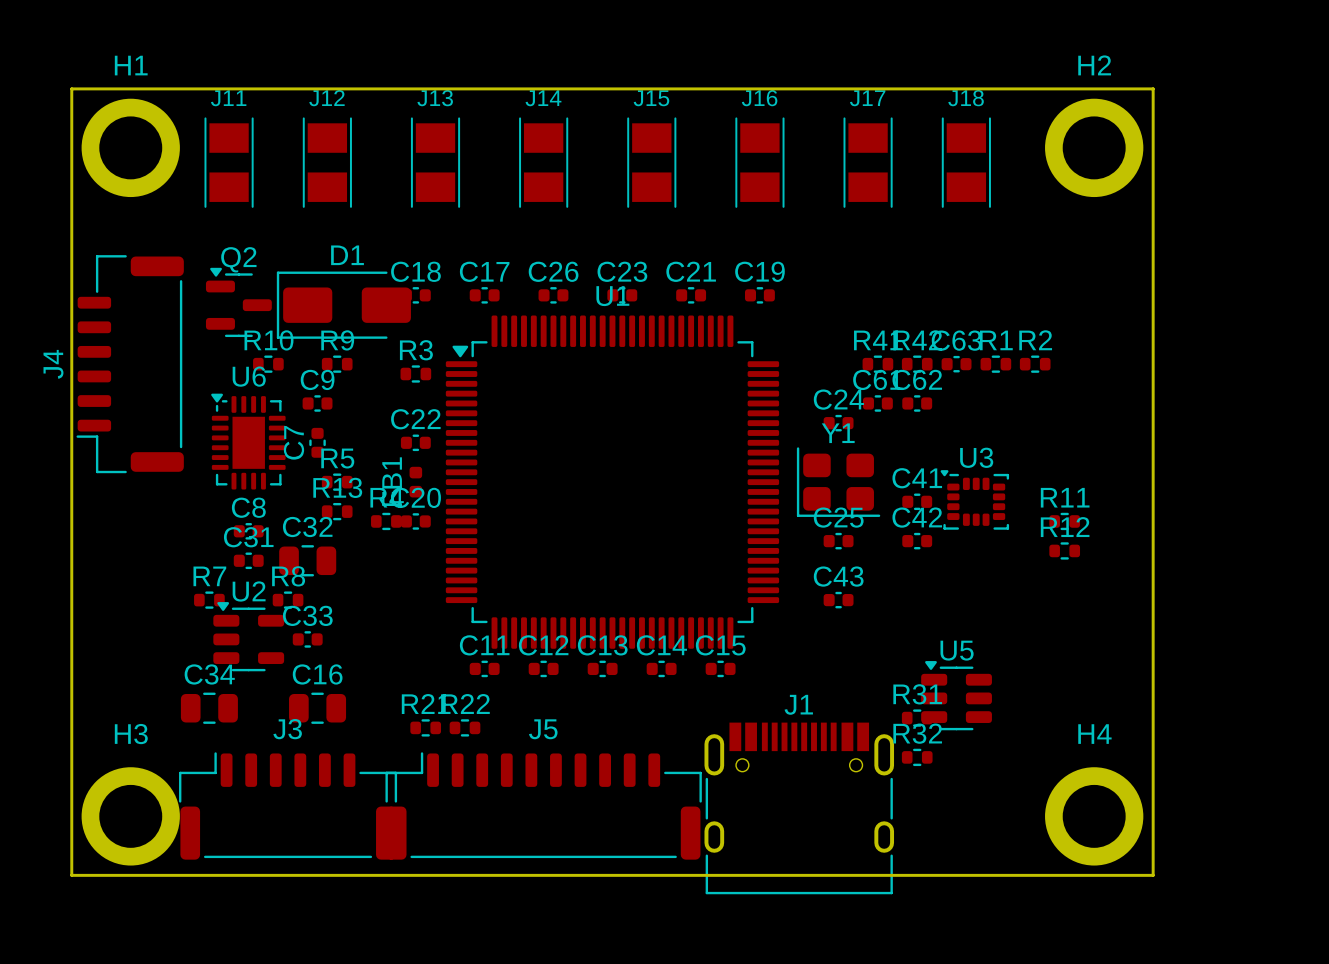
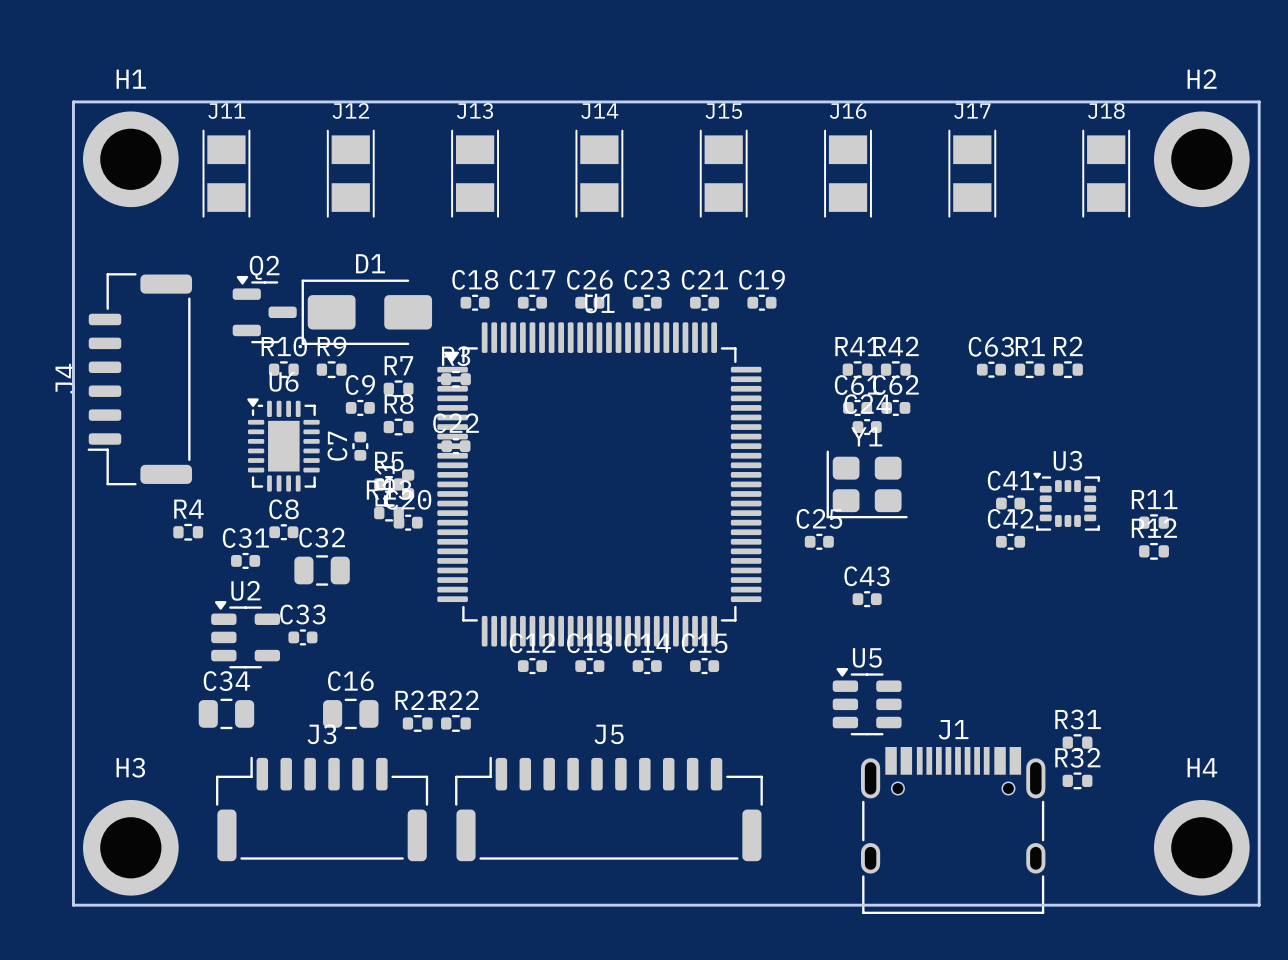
board edge: (1153, 88) (1153, 875) (71, 875) -> (1125, 101) (1259, 101) (1259, 905) (73, 905) (73, 866)
J17 name: J17 (867, 98) -> J16 (848, 111)
H2 position: (1094, 147) -> (1201, 159)
J12 position: (327, 162) -> (350, 173)
J13 position: (435, 162) -> (475, 173)
J14 position: (543, 162) -> (599, 173)
J15 position: (651, 162) -> (723, 173)
J16: (759, 162) -> none
J18 position: (966, 162) -> (1106, 173)
J17: none -> (972, 173)
C17 name: C17 (484, 271) -> C18 (475, 279)
C18: (415, 295) -> none
C17: none -> (532, 302)
C26 position: (553, 295) -> (589, 302)
C23 position: (622, 295) -> (647, 302)
C21 position: (691, 295) -> (704, 302)
C19 position: (759, 295) -> (761, 302)
Q2 position: (238, 302) -> (264, 309)
D1 position: (343, 305) -> (366, 312)
J4 position: (130, 364) -> (139, 379)
R10 position: (268, 364) -> (283, 369)
C63 position: (956, 364) -> (991, 369)
R1 position: (995, 364) -> (1029, 369)
R2 position: (1035, 364) -> (1067, 369)
R3 position: (415, 373) -> (455, 379)
C9 position: (317, 403) -> (360, 407)
C24 position: (838, 423) -> (867, 427)
U6 position: (248, 441) -> (283, 444)
C7 position: (317, 442) -> (360, 446)
C22 position: (415, 442) -> (455, 446)
R5 position: (337, 482) -> (389, 484)
Y1 position: (838, 482) -> (867, 484)
U3 position: (974, 499) -> (1066, 501)
C41 position: (917, 501) -> (1010, 503)
R13 position: (337, 511) -> (389, 513)
R4 position: (386, 521) -> (188, 532)
R11 position: (1064, 521) -> (1154, 522)
C8 position: (248, 531) -> (283, 532)
C42 position: (917, 541) -> (1010, 541)
R12 position: (1064, 550) -> (1154, 551)
C32 position: (307, 560) -> (322, 570)
R7 position: (209, 600) -> (398, 388)
R8 position: (288, 600) -> (398, 427)
C43 position: (838, 600) -> (867, 599)
C11: (484, 668) -> none
U5 position: (956, 695) -> (867, 701)
C34 position: (209, 708) -> (226, 713)
C16 position: (317, 708) -> (350, 713)
R31 position: (917, 718) -> (1077, 742)
R32 position: (917, 757) -> (1077, 780)
J3 position: (288, 805) -> (322, 808)
J5 position: (543, 805) -> (608, 808)
J1 position: (799, 808) -> (953, 830)
H3 position: (130, 816) -> (130, 847)
H4 position: (1094, 816) -> (1201, 847)

